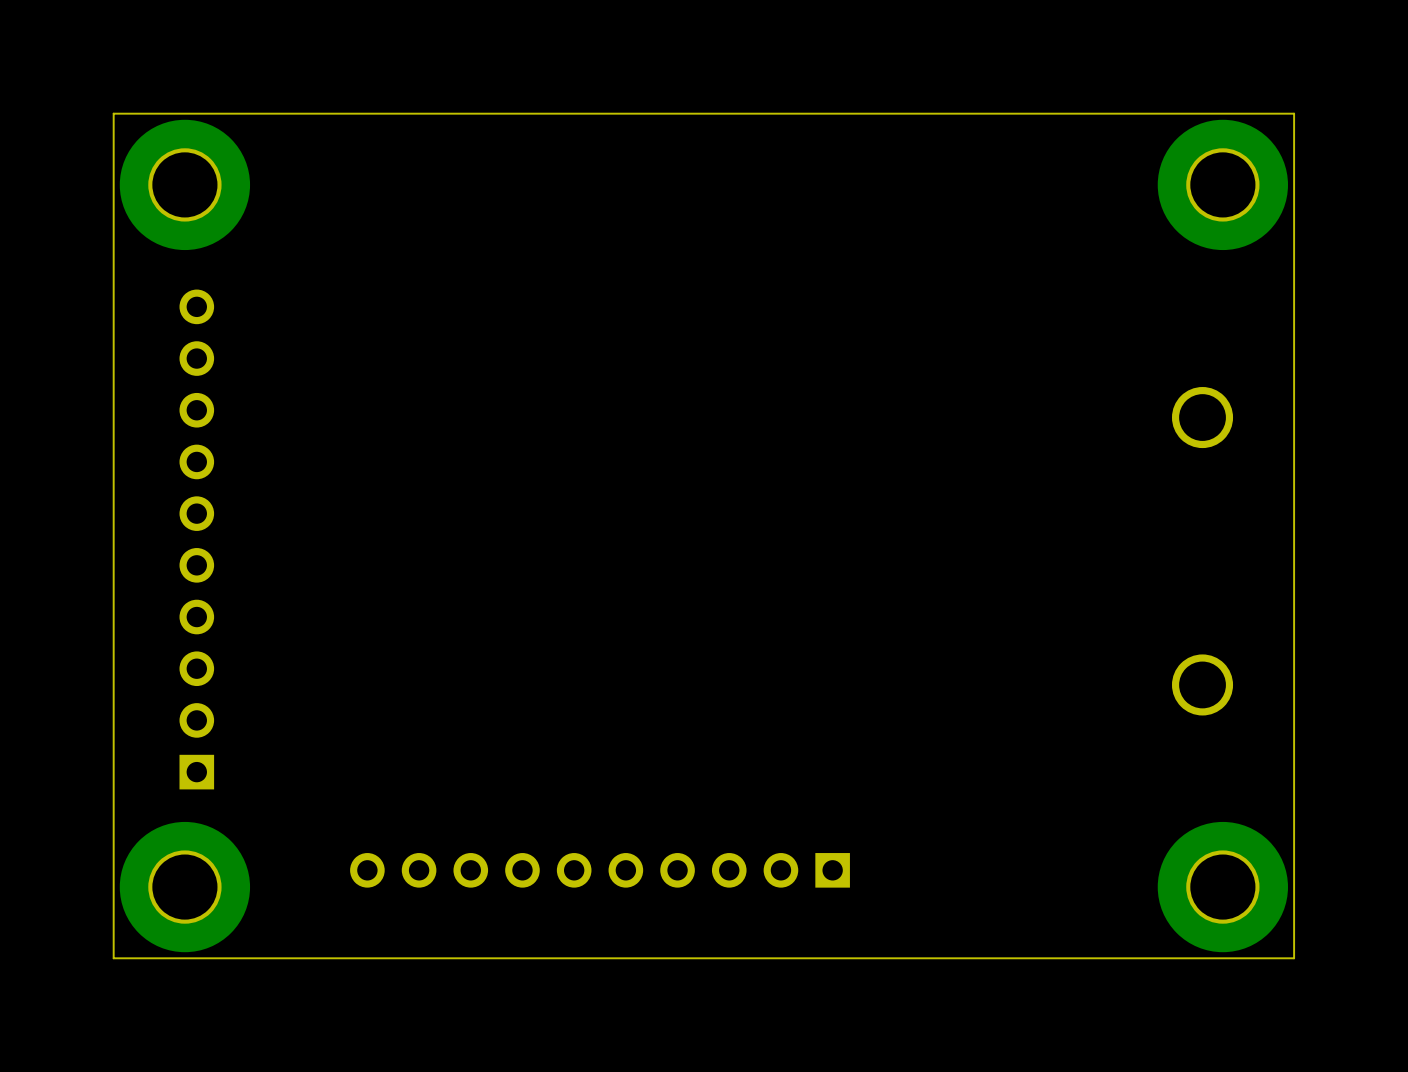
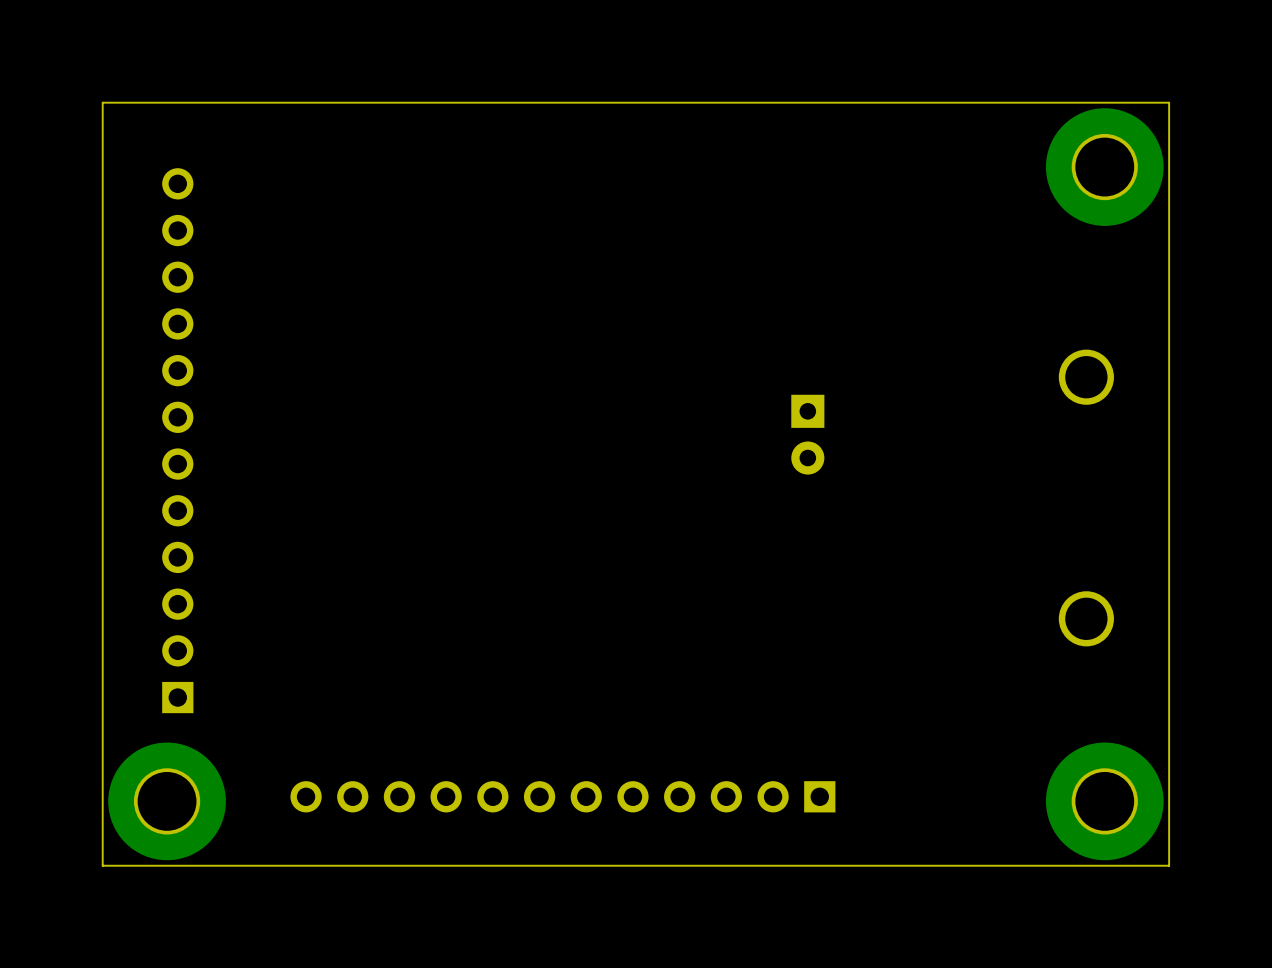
part: (184, 184) -> none
part: none -> (807, 434)
part: none -> (177, 440)
part: (600, 870) -> none
part: none -> (562, 796)

